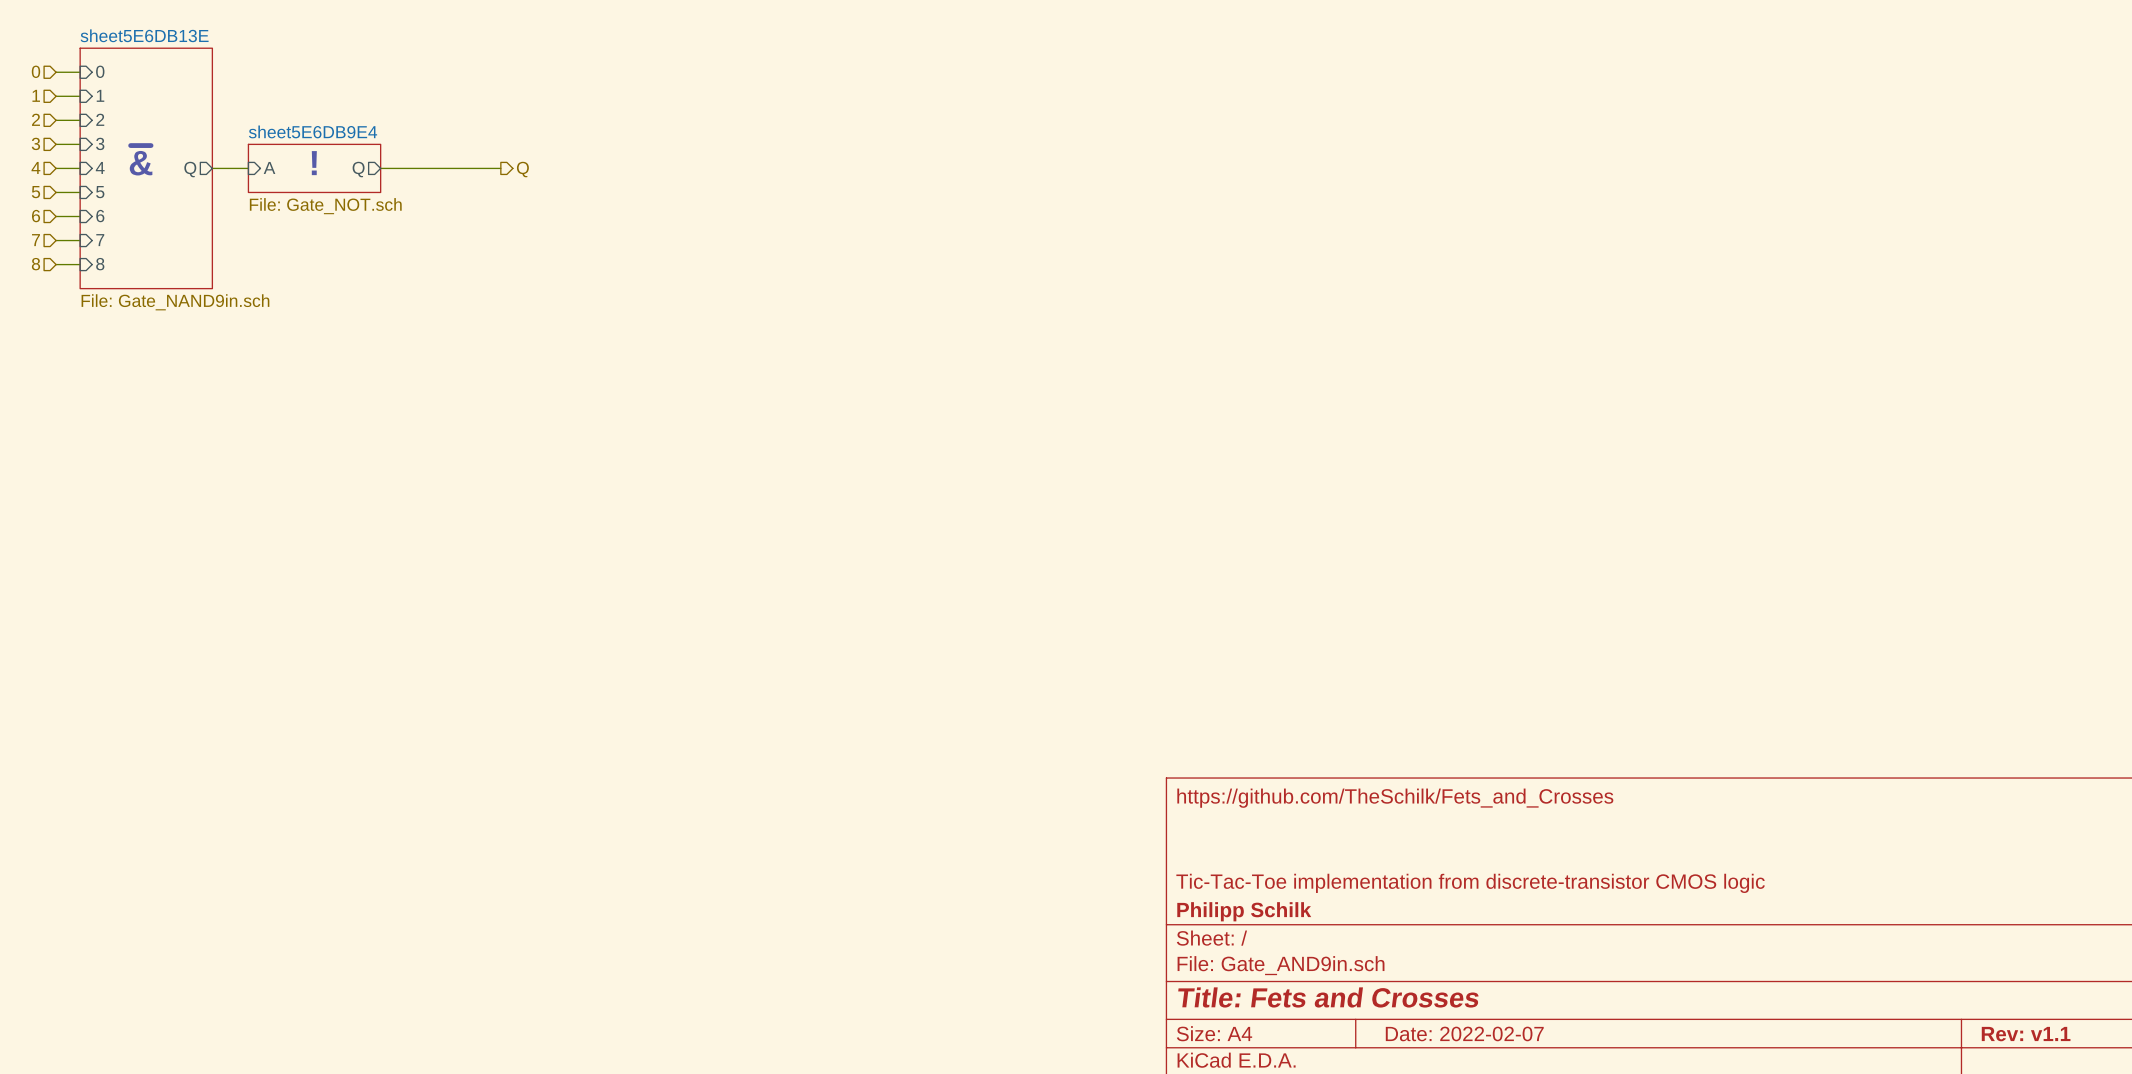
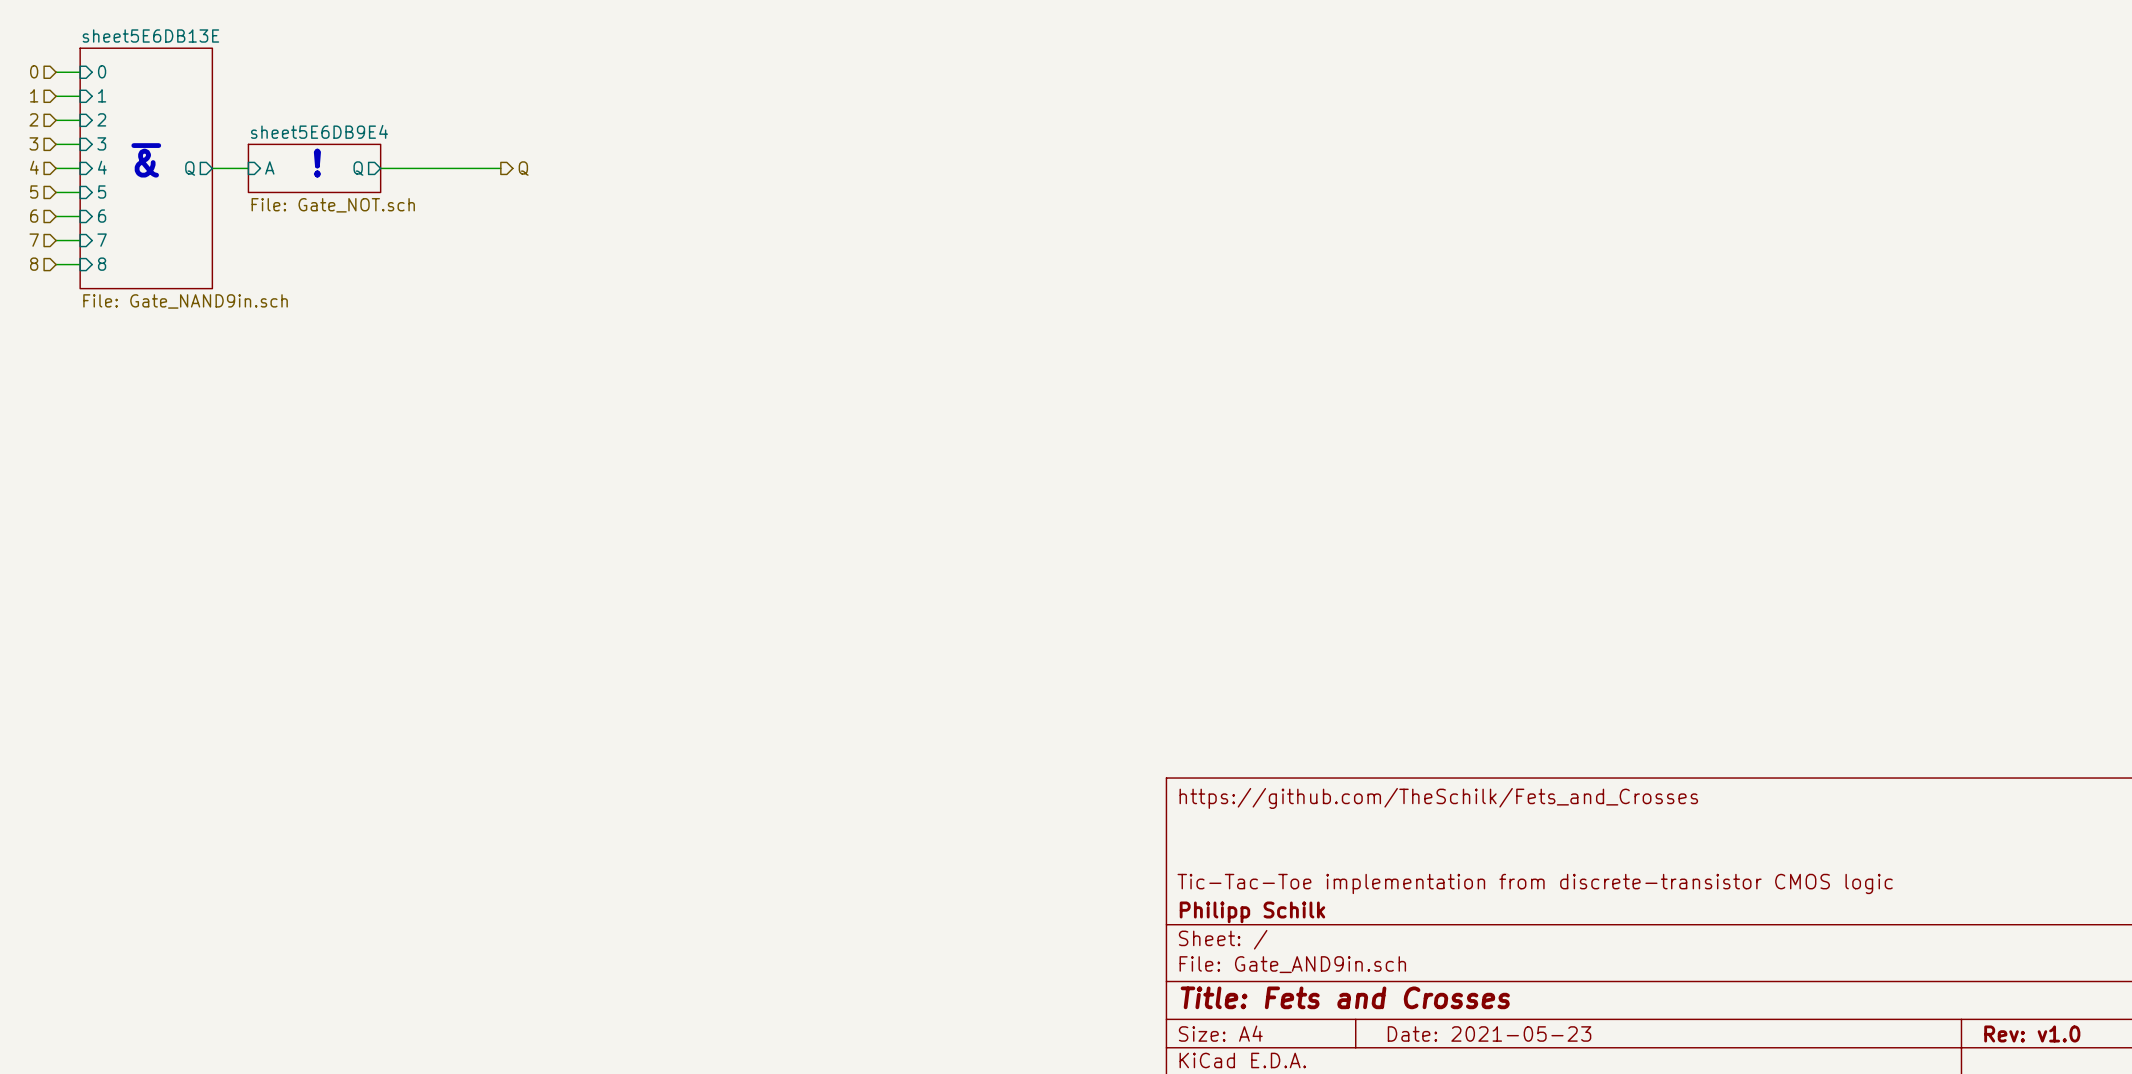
title block: Date: 2022-02-07 (1464, 1033) -> Date: 2021-05-23 (1489, 1033)
title block: Rev: v1.1 (2026, 1034) -> Rev: v1.0 (2032, 1033)

